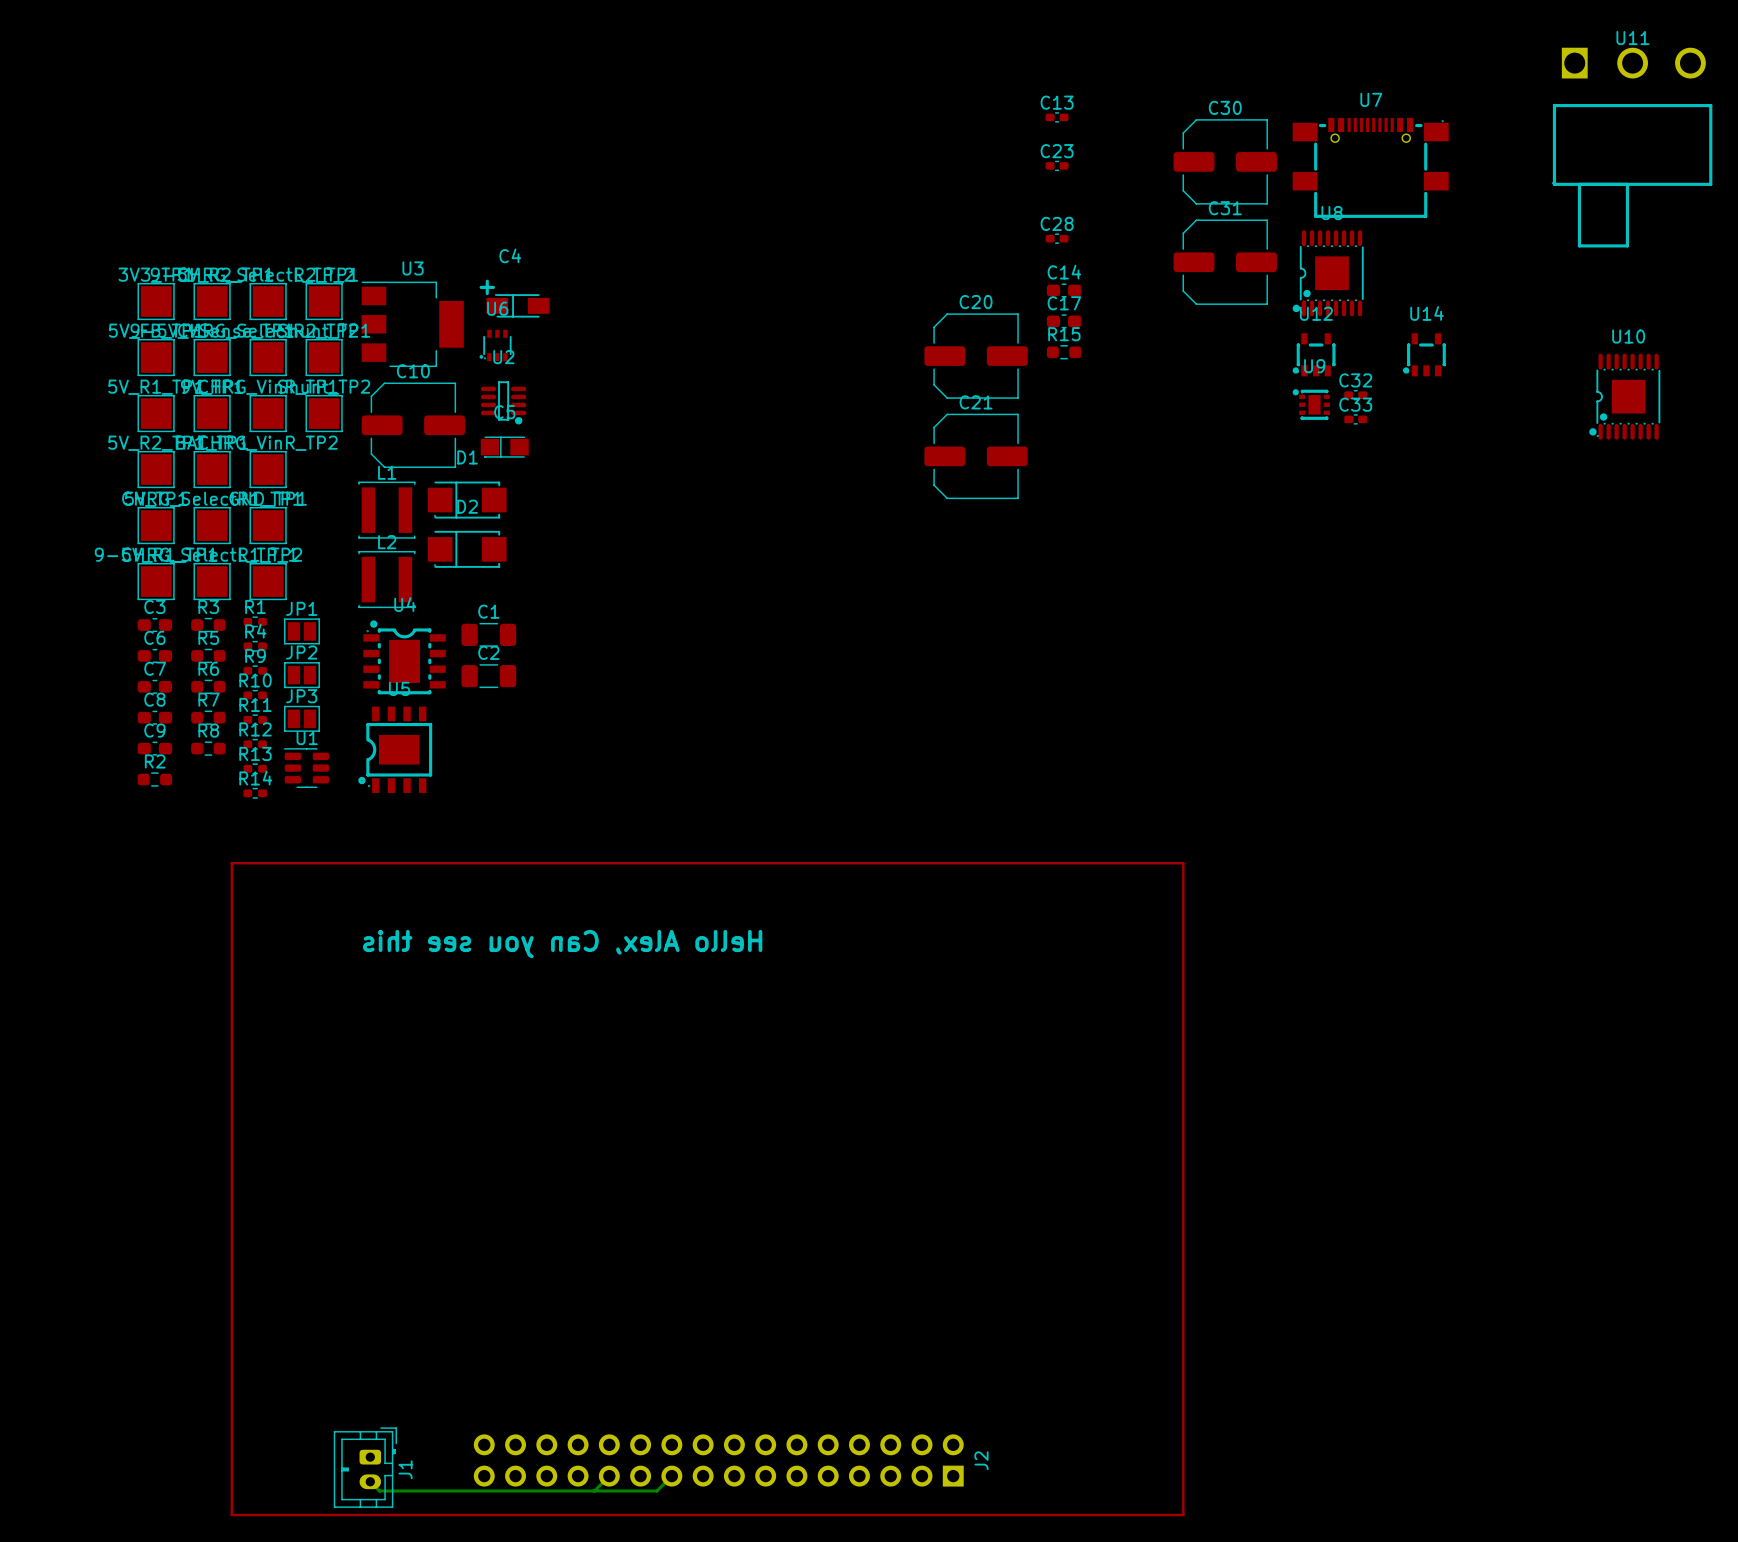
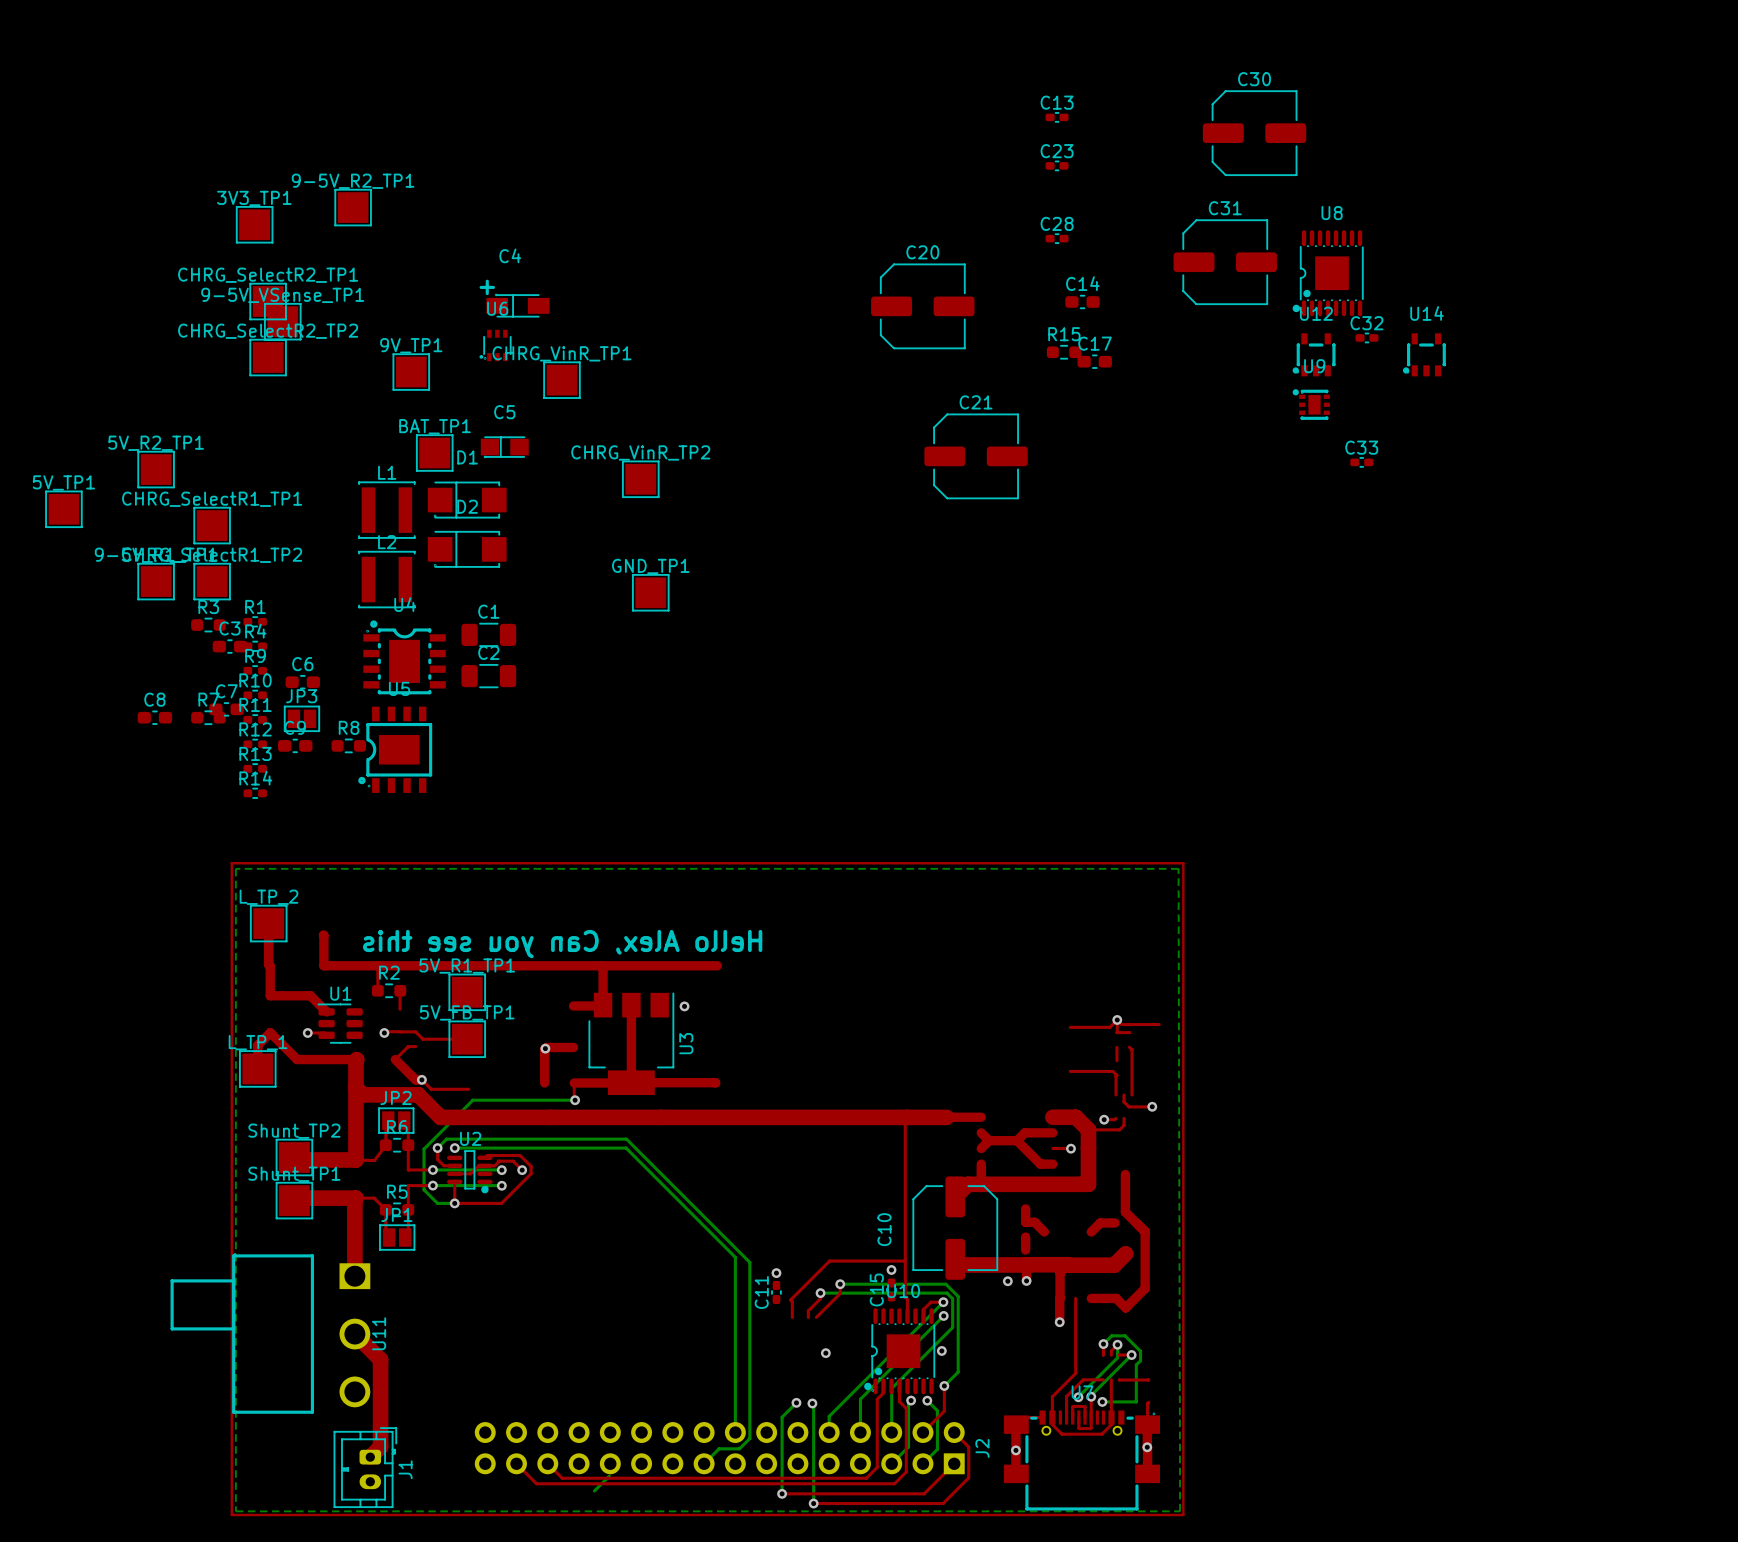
U11 rotation: 0° (1632, 147) -> 90° clockwise (270, 1333)
U11 position: (1632, 147) -> (270, 1333)
C30 position: (1225, 161) -> (1254, 133)
U7 position: (1370, 167) -> (1081, 1460)
C14 position: (1064, 290) -> (1082, 301)
3V3_TP1 position: (156, 301) -> (254, 224)
9-5V_R2_TP1 position: (212, 301) -> (353, 207)
L_TP_2 position: (324, 301) -> (268, 923)
C17 position: (1064, 321) -> (1094, 361)
U3 rotation: 0° (412, 324) -> 90° clockwise (631, 1043)
U3 position: (412, 324) -> (631, 1043)
C20 position: (976, 356) -> (922, 306)
5V_FB_TP1 position: (156, 357) -> (467, 1039)
9-5V_VSense_TP1 position: (212, 357) -> (282, 321)
Shunt_TP1 position: (324, 357) -> (294, 1200)
U2 name position: U2 (503, 357) -> U2 (470, 1138)
C10 name position: C10 (413, 371) -> C10 (884, 1229)
C32 position: (1355, 395) -> (1366, 337)
U10 position: (1624, 396) -> (899, 1351)
U2 position: (503, 402) -> (469, 1171)
5V_R1_TP1 position: (156, 413) -> (467, 992)
9V_TP1 position: (212, 413) -> (411, 372)
CHRG_VinR_TP1 position: (268, 413) -> (561, 380)
Shunt_TP2 position: (324, 413) -> (294, 1157)
C33 position: (1355, 419) -> (1361, 462)
C10 rotation: 0° (413, 425) -> 90° clockwise (955, 1228)
C10 position: (413, 425) -> (955, 1228)
BAT_TP1 position: (212, 469) -> (434, 453)
CHRG_VinR_TP2 position: (268, 469) -> (640, 479)
5V_TP1 position: (156, 525) -> (63, 509)
GND_TP1 position: (268, 525) -> (650, 592)
L_TP_1 position: (268, 581) -> (257, 1068)
C3 position: (154, 625) -> (229, 646)
JP1 position: (301, 631) -> (397, 1237)
C6 position: (154, 655) -> (302, 682)
R5 position: (208, 655) -> (397, 1209)
JP2 position: (301, 675) -> (396, 1120)
C7 position: (154, 686) -> (226, 709)
R6 position: (208, 686) -> (397, 1145)
C9 position: (154, 748) -> (295, 745)
R8 position: (208, 748) -> (348, 745)
U1 position: (306, 768) -> (340, 1023)
R2 position: (154, 779) -> (389, 990)
bottom zone outline: none -> (235, 868) (1178, 868) (1180, 1511) (235, 1511) (235, 868)
top track: none -> (268, 923) (270, 995) (310, 995) (326, 1011)
top track: none -> (323, 934) (323, 965) (717, 965)
top track: none -> (378, 965) (377, 990)
top track: none -> (601, 965) (603, 1005) (573, 1005)
top track: none -> (400, 990) (400, 1009)
top track: none -> (631, 1005) (631, 1082)
via: none -> (684, 1006)
top track: none -> (1117, 1019) (1116, 1032) (1129, 1032)
top track: none -> (1117, 1019) (1121, 1024) (1159, 1024)
top track: none -> (1117, 1019) (1109, 1027) (1070, 1027)
via: none -> (1117, 1019)
top track: none -> (400, 1031) (384, 1032)
top track: none -> (400, 1031) (415, 1031) (423, 1039) (467, 1039)
top track: none -> (307, 1032) (324, 1032) (326, 1035)
via: none -> (307, 1032)
via: none -> (384, 1032)
top track: none -> (415, 1046) (408, 1046) (395, 1059) (415, 1079) (421, 1079) (431, 1089) (468, 1089)
top track: none -> (573, 1047) (546, 1047) (544, 1049) (544, 1083)
top track: none -> (1116, 1047) (1116, 1060)
top track: none -> (1129, 1047) (1132, 1049) (1132, 1095)
via: none -> (545, 1048)
top track: none -> (257, 1068) (257, 1045) (270, 1032) (297, 1059) (356, 1059) (355, 1159)
top track: none -> (1070, 1071) (1112, 1071) (1116, 1075) (1116, 1095)
via: none -> (421, 1079)
top track: none -> (631, 1082) (574, 1083) (575, 1100)
top track: none -> (631, 1082) (715, 1083)
top track: none -> (355, 1087) (363, 1094) (418, 1094) (440, 1117) (946, 1117)
top track: none -> (1124, 1095) (1124, 1101) (1128, 1106) (1152, 1106)
bottom track: none -> (575, 1100) (472, 1100) (424, 1149) (424, 1189) (437, 1203) (454, 1203)
via: none -> (575, 1100)
via: none -> (1152, 1106)
top track: none -> (907, 1117) (905, 1119) (905, 1297) (907, 1299) (907, 1316)
top track: none -> (947, 1117) (981, 1117)
top track: none -> (1052, 1117) (1075, 1117) (1088, 1129)
top track: none -> (1116, 1118) (1104, 1119)
top track: none -> (1124, 1118) (1124, 1125) (1119, 1129) (1088, 1129)
via: none -> (1104, 1119)
top track: none -> (388, 1120) (385, 1123) (385, 1145) (374, 1160) (355, 1159)
top track: none -> (404, 1120) (408, 1124) (408, 1169)
top track: none -> (1088, 1129) (1088, 1184) (967, 1184) (955, 1196)
top track: none -> (981, 1132) (989, 1140)
top track: none -> (1052, 1132) (1024, 1132) (1017, 1140)
top track: none -> (989, 1140) (981, 1148)
top track: none -> (989, 1140) (1017, 1140)
top track: none -> (1017, 1140) (1040, 1164) (1052, 1164)
top track: none -> (437, 1148) (437, 1159) (443, 1165) (454, 1165)
bottom track: none -> (437, 1148) (446, 1139) (626, 1139) (749, 1262) (749, 1438) (739, 1448) (719, 1448) (704, 1463)
via: none -> (437, 1148)
bottom track: none -> (454, 1148) (626, 1148) (735, 1257) (735, 1432)
via: none -> (454, 1148)
top track: none -> (1052, 1148) (1070, 1148)
via: none -> (1070, 1148)
top track: none -> (294, 1157) (296, 1159) (355, 1159)
top track: none -> (484, 1157) (487, 1155) (520, 1155) (531, 1166) (531, 1173) (501, 1203) (454, 1203) (454, 1181)
top track: none -> (498, 1161) (513, 1161) (522, 1170)
top track: none -> (499, 1161) (494, 1165) (478, 1165) (470, 1173) (454, 1173)
top track: none -> (981, 1164) (981, 1184)
top track: none -> (408, 1169) (432, 1169)
bottom track: none -> (432, 1169) (503, 1169)
via: none -> (432, 1169)
via: none -> (501, 1170)
via: none -> (522, 1170)
top track: none -> (1125, 1174) (1125, 1212) (1145, 1231) (1145, 1288) (1125, 1307) (1116, 1298) (1091, 1298)
top track: none -> (432, 1185) (408, 1185) (408, 1234) (405, 1237)
bottom track: none -> (432, 1185) (503, 1185)
via: none -> (432, 1185)
via: none -> (501, 1185)
top track: none -> (355, 1198) (374, 1198) (385, 1209) (385, 1234) (389, 1237)
top track: none -> (355, 1198) (354, 1276)
top track: none -> (355, 1198) (296, 1198) (294, 1200)
via: none -> (454, 1203)
top track: none -> (1025, 1208) (1025, 1222) (1034, 1222) (1044, 1231)
top track: none -> (1115, 1222) (1100, 1222) (1091, 1231)
top track: none -> (1025, 1237) (1025, 1250)
top track: none -> (1125, 1253) (1114, 1265) (1067, 1265)
top track: none -> (955, 1259) (960, 1264) (1025, 1264) (1026, 1280)
top track: none -> (905, 1261) (829, 1261) (790, 1299) (792, 1301) (792, 1317)
top track: none -> (1025, 1264) (1067, 1265)
top track: none -> (1067, 1265) (1060, 1273) (1059, 1322)
via: none -> (891, 1269)
via: none -> (776, 1273)
via: none -> (1026, 1280)
via: none -> (1007, 1281)
top track: none -> (840, 1284) (840, 1293) (816, 1317)
bottom track: none -> (840, 1284) (945, 1284) (958, 1296) (958, 1372) (944, 1385)
via: none -> (840, 1284)
C15: none -> (891, 1289)
C11: none -> (776, 1292)
top track: none -> (820, 1293) (820, 1298) (808, 1310) (808, 1317)
bottom track: none -> (820, 1293) (946, 1293) (952, 1298) (952, 1327) (891, 1388) (891, 1432)
via: none -> (820, 1293)
top track: none -> (1075, 1298) (1075, 1373) (1052, 1396) (1052, 1424) (1061, 1434) (1101, 1434) (1111, 1424) (1111, 1379)
top track: none -> (943, 1302) (930, 1302) (923, 1309) (923, 1316)
bottom track: none -> (943, 1302) (829, 1416) (829, 1432)
via: none -> (943, 1302)
bottom track: none -> (943, 1315) (860, 1399) (860, 1432)
via: none -> (943, 1315)
via: none -> (1059, 1322)
top track: none -> (354, 1334) (380, 1359) (380, 1446) (370, 1457)
top track: none -> (1103, 1344) (1103, 1355)
bottom track: none -> (1103, 1344) (1111, 1335) (1125, 1335) (1140, 1351) (1140, 1360) (1136, 1364) (1136, 1401) (1102, 1401)
via: none -> (1103, 1344)
top track: none -> (1117, 1344) (1111, 1351) (1111, 1355)
bottom track: none -> (1117, 1344) (1117, 1357) (1078, 1397)
via: none -> (1117, 1344)
via: none -> (941, 1350)
via: none -> (825, 1353)
top track: none -> (1131, 1355) (1119, 1355)
bottom track: none -> (1131, 1355) (1091, 1396)
via: none -> (1131, 1355)
top track: none -> (1103, 1379) (1083, 1379) (1066, 1396) (1066, 1417)
top track: none -> (1148, 1379) (1119, 1379)
top track: none -> (944, 1385) (944, 1411) (922, 1432)
via: none -> (944, 1385)
top track: none -> (883, 1386) (883, 1393) (877, 1399) (877, 1467) (866, 1478) (562, 1478) (547, 1463)
top track: none -> (899, 1386) (899, 1401) (906, 1408) (906, 1472) (894, 1483) (536, 1483) (516, 1463)
top track: none -> (1091, 1396) (1091, 1428) (1079, 1428) (1078, 1417)
via: none -> (1091, 1396)
via: none -> (1078, 1397)
bottom track: none -> (911, 1400) (908, 1403) (908, 1446) (891, 1463)
via: none -> (911, 1400)
bottom track: none -> (927, 1400) (937, 1410) (937, 1449) (922, 1463)
via: none -> (927, 1400)
via: none -> (1102, 1401)
bottom track: none -> (796, 1402) (782, 1417) (782, 1493)
via: none -> (796, 1402)
top track: none -> (1148, 1402) (1147, 1473)
bottom track: none -> (812, 1403) (813, 1503)
via: none -> (812, 1403)
top track: none -> (1042, 1417) (1023, 1417) (1015, 1425) (1016, 1473)
top track: none -> (1072, 1417) (1073, 1406) (1084, 1406) (1085, 1417)
top track: none -> (954, 1432) (968, 1446) (968, 1477) (943, 1503) (813, 1503)
via: none -> (1147, 1447)
via: none -> (1015, 1450)
J2 position: (718, 1460) -> (719, 1448)
top track: none -> (954, 1463) (924, 1493) (782, 1493)
bottom track: (671, 1476) (656, 1490) (379, 1490) (370, 1481) -> none
via: none -> (782, 1493)
via: none -> (813, 1503)

